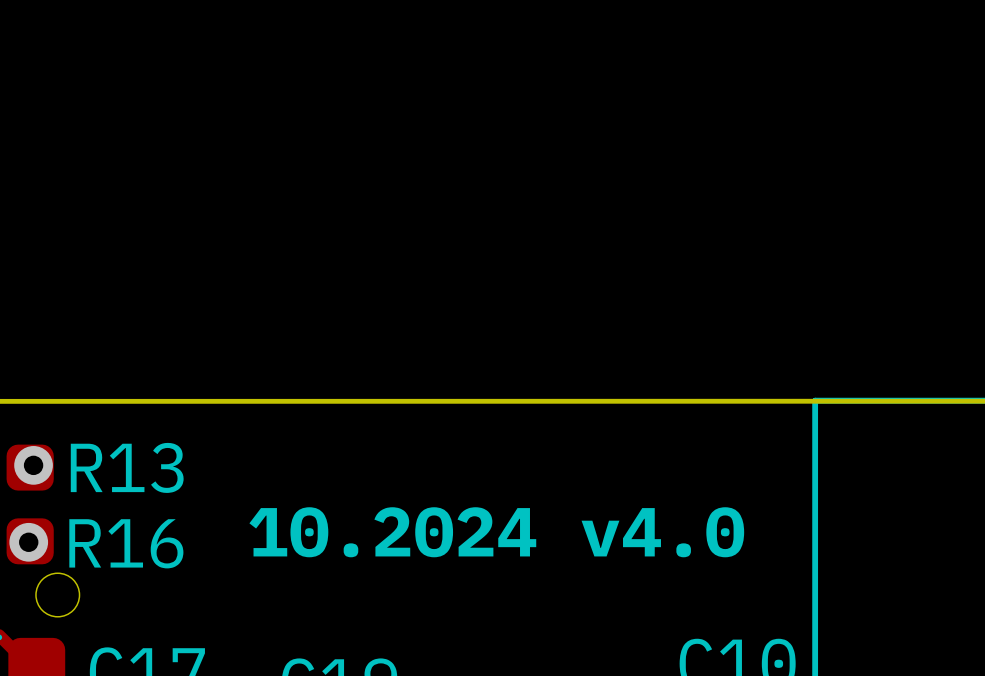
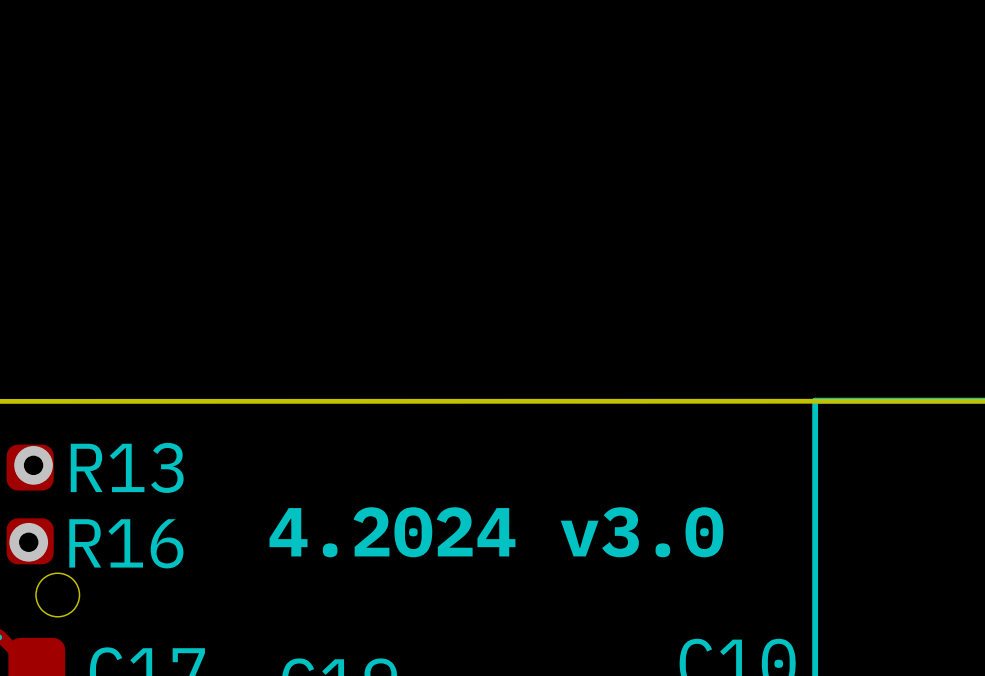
text: 10.2024 v4.0 (496, 532) -> 4.2024 v3.0 (496, 532)

